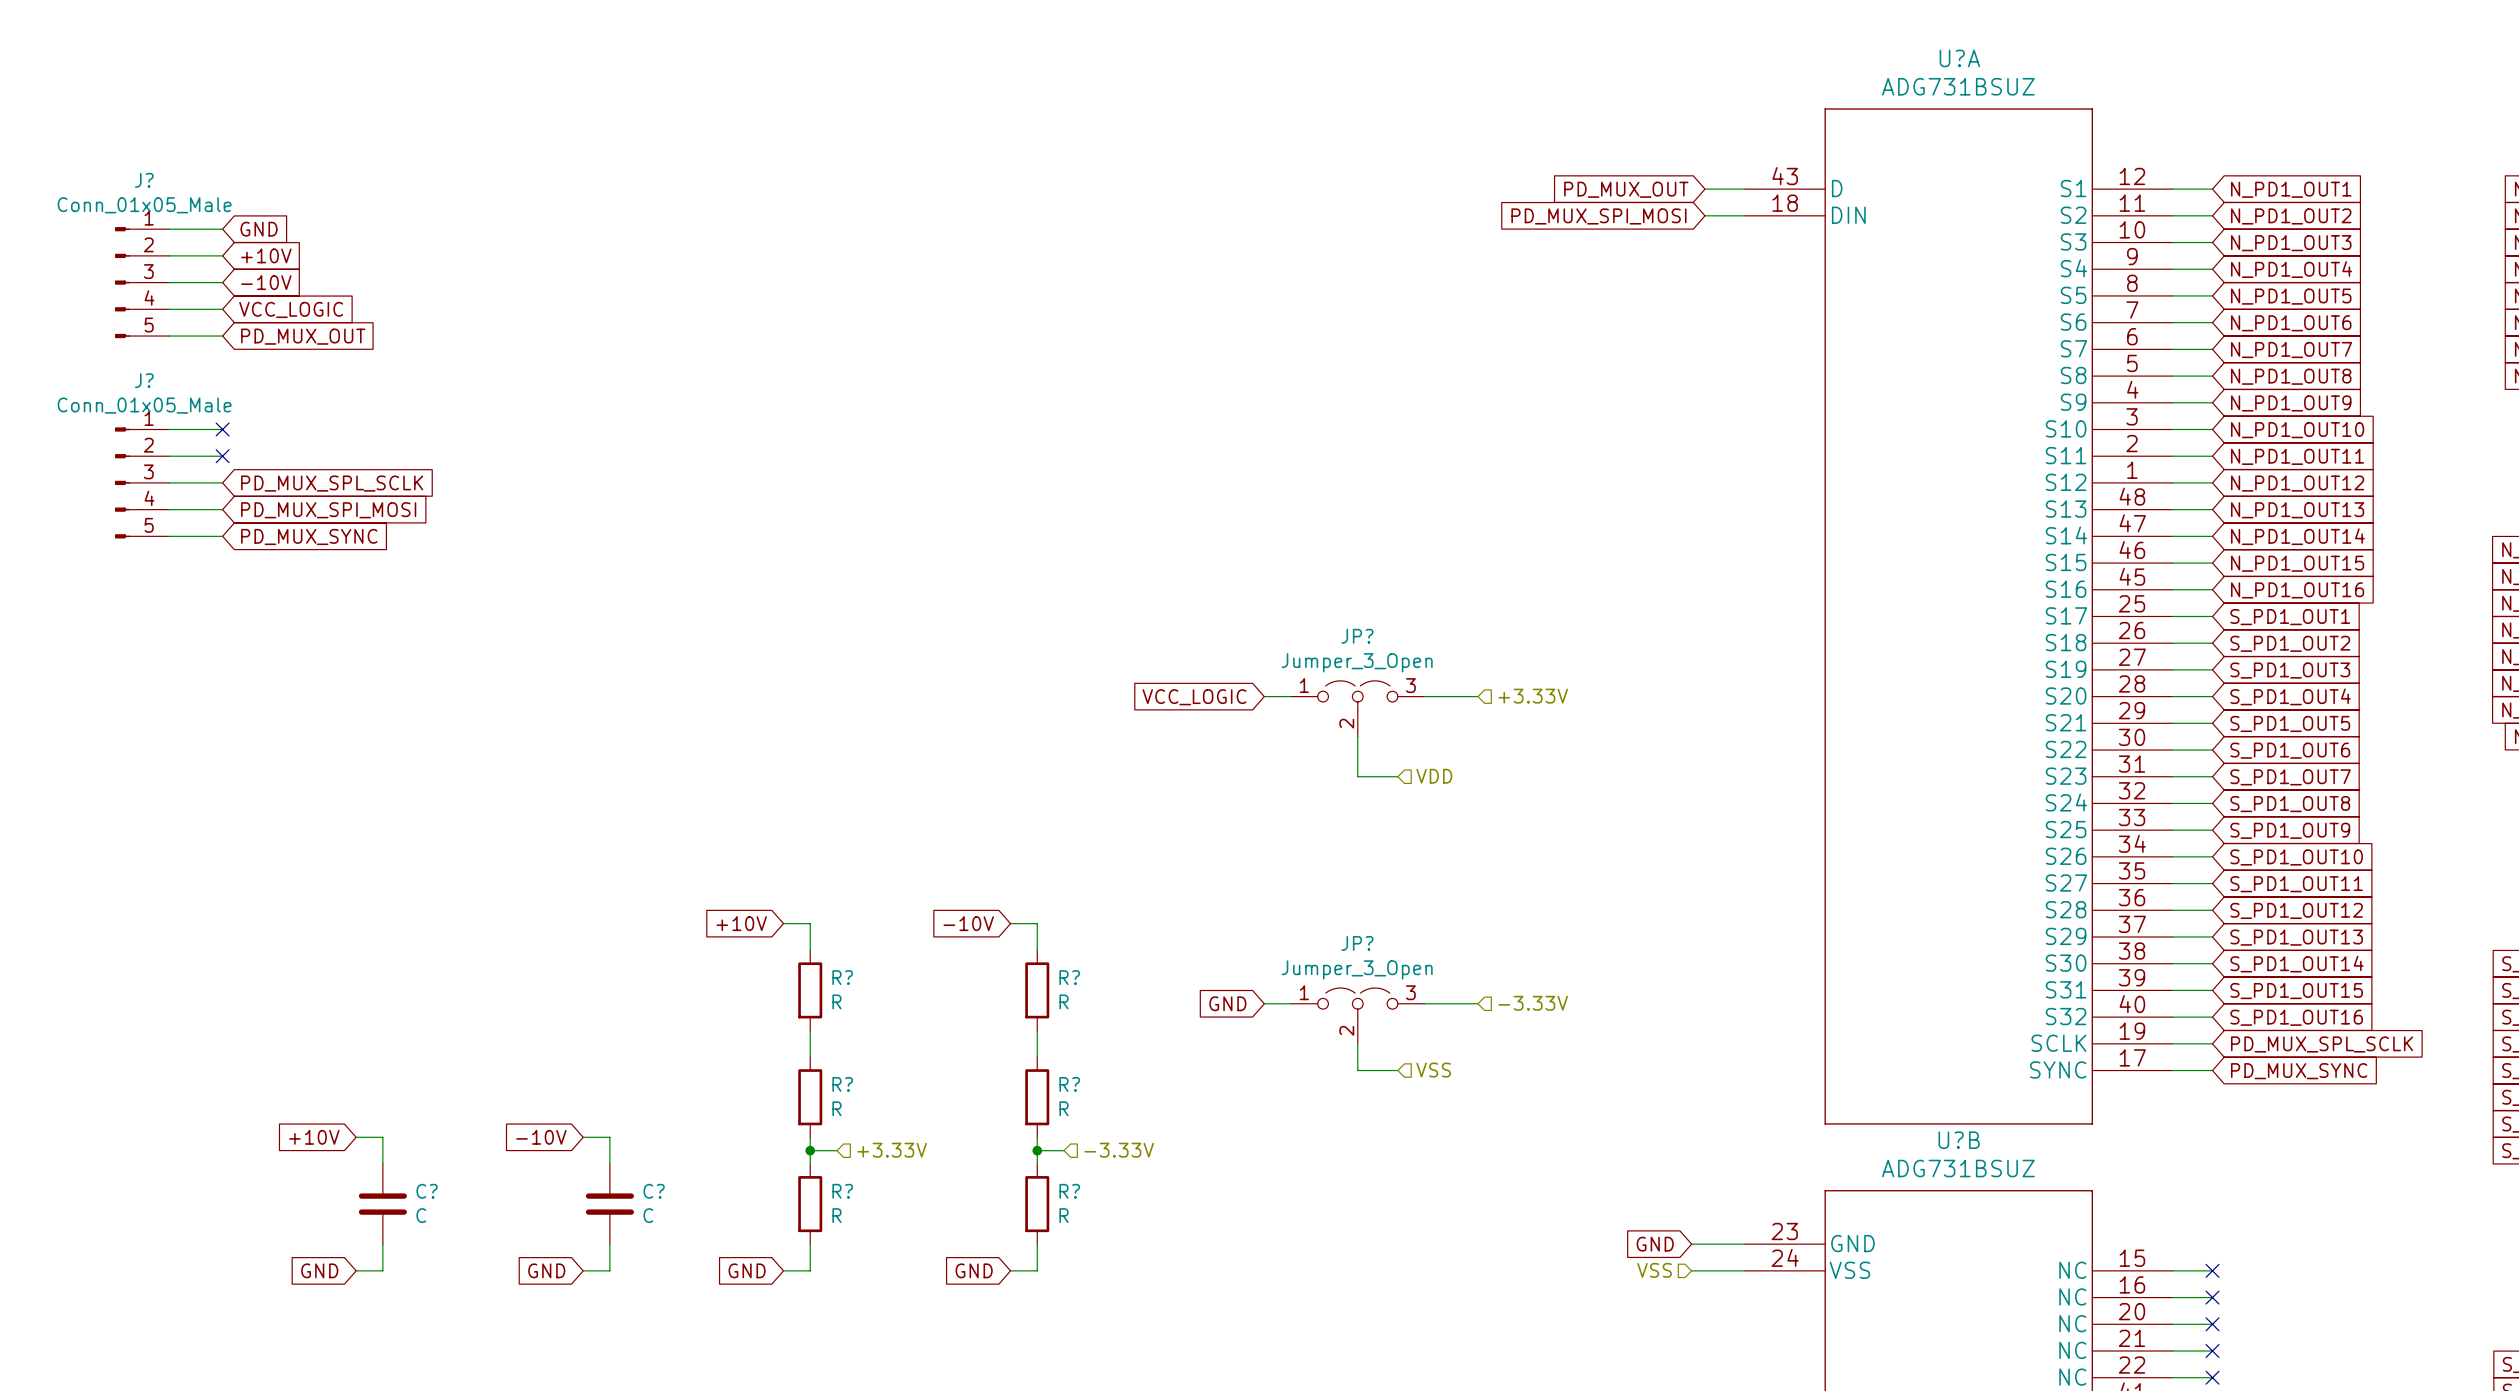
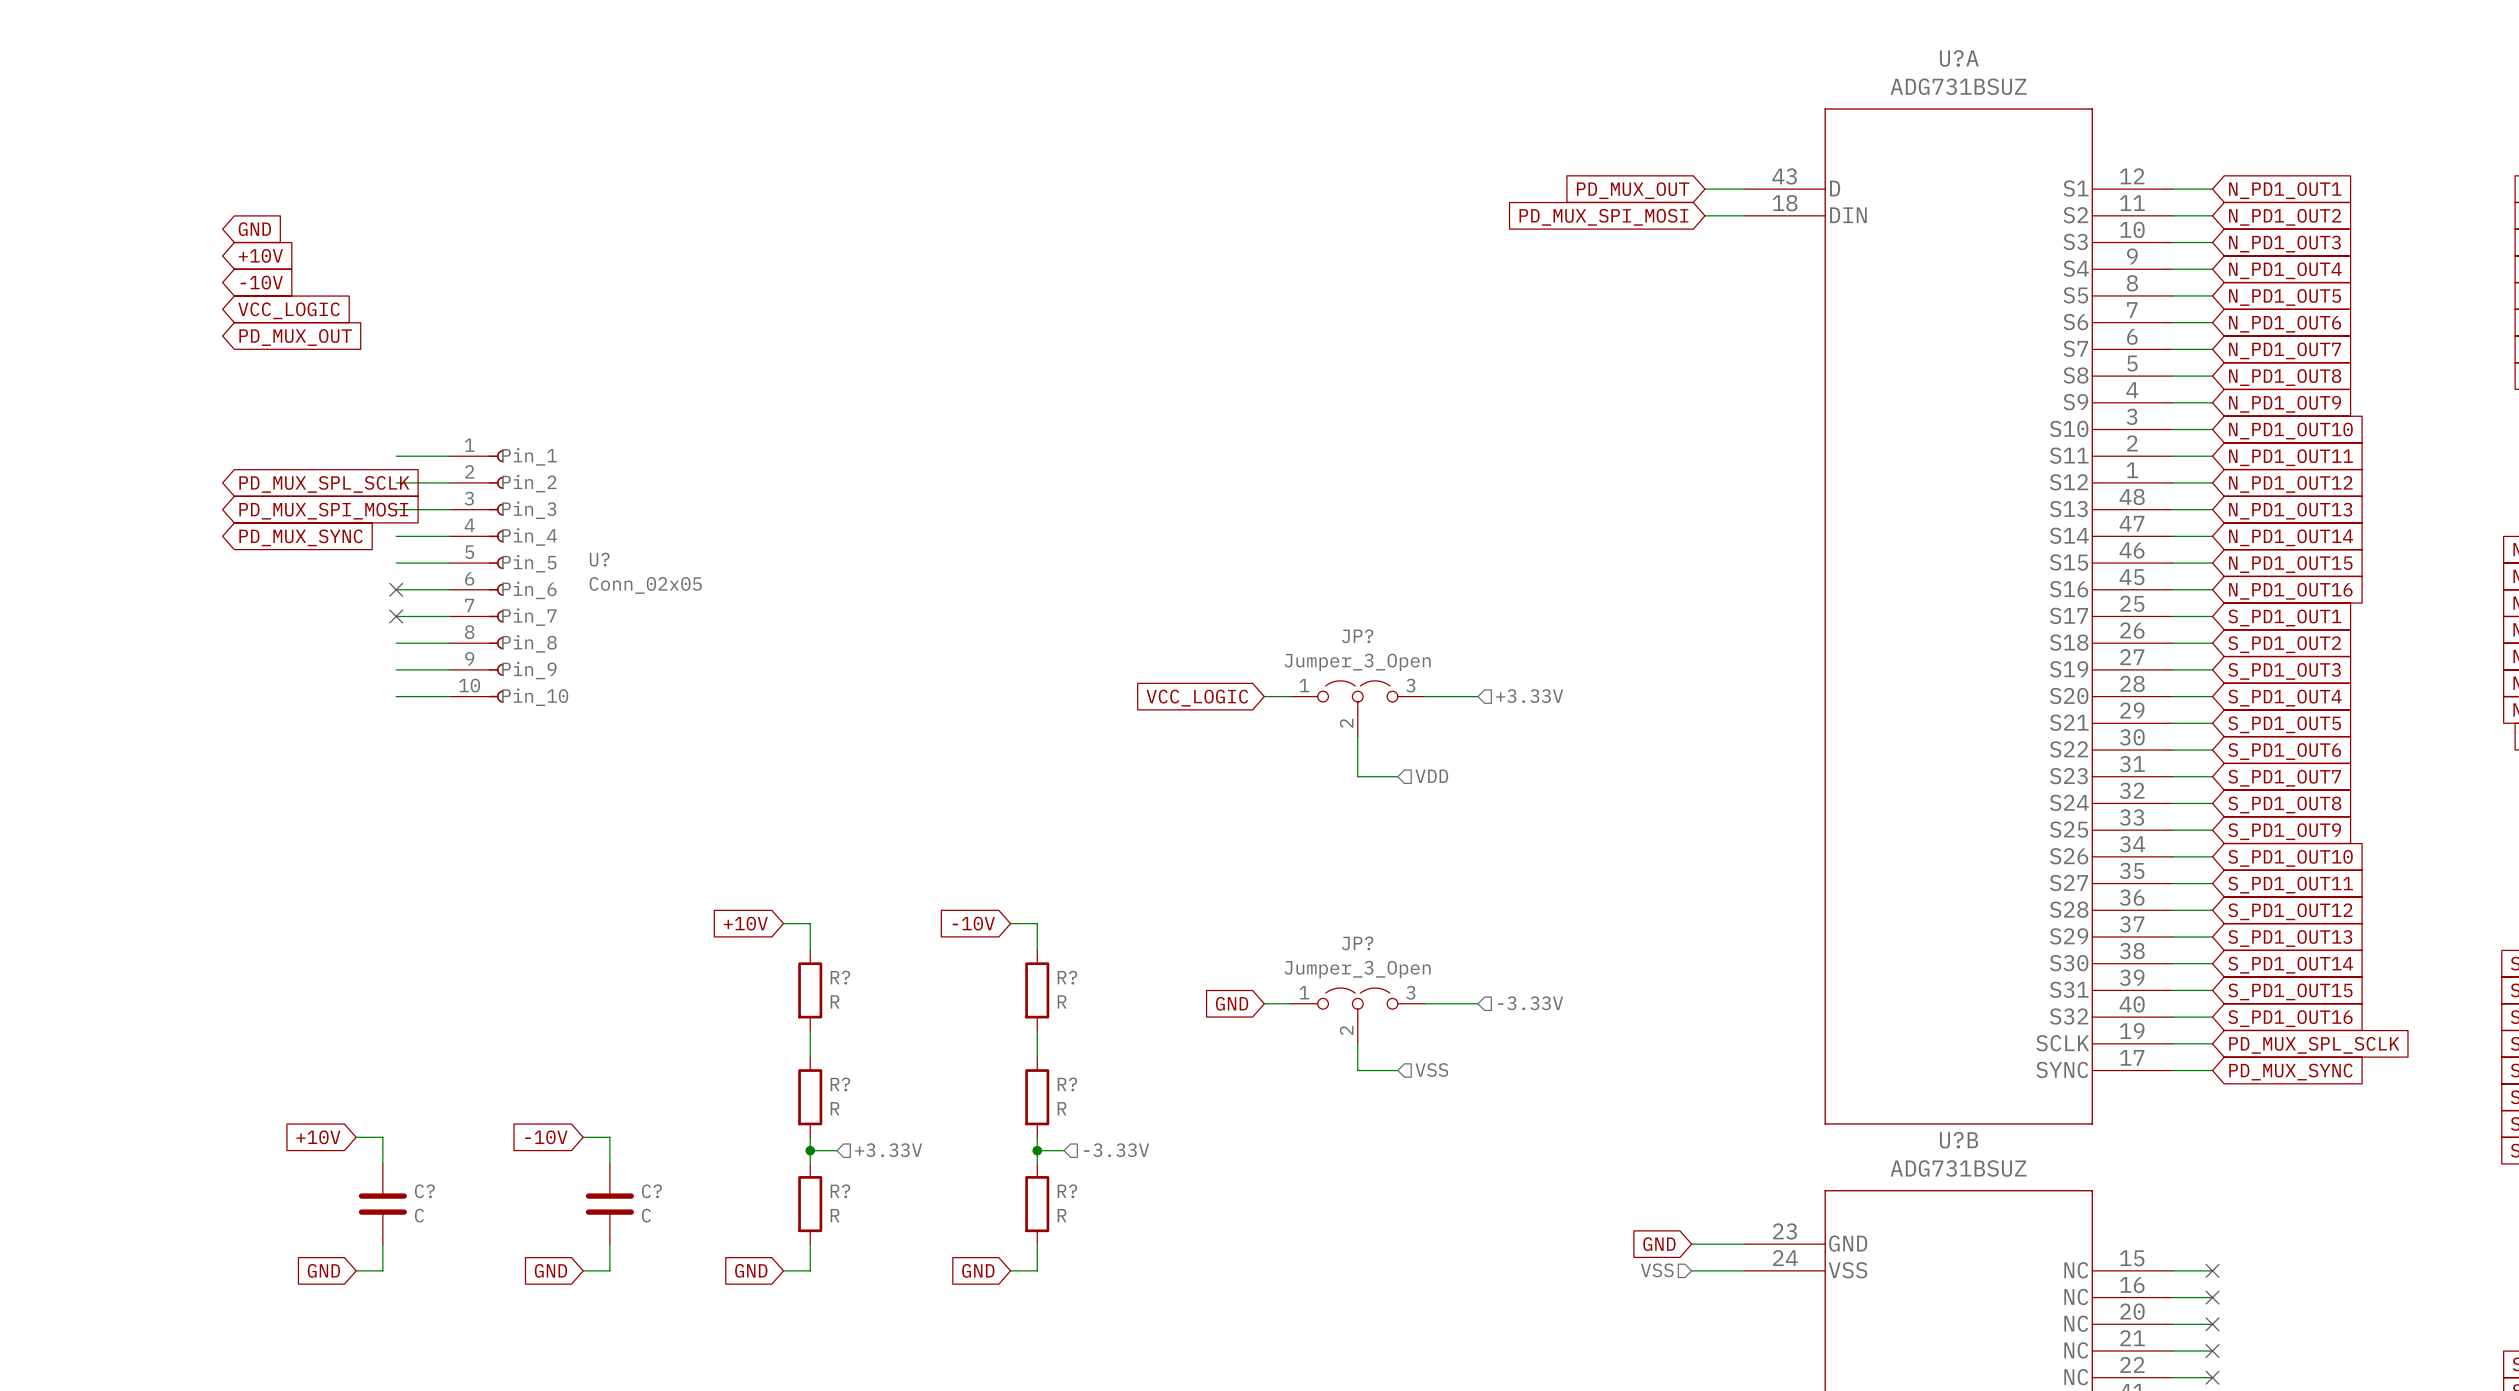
wire: (169, 229) (222, 229) -> none
wire: (169, 255) (222, 255) -> none
J?: Conn_01x05_Male (142, 282) -> none
wire: (169, 282) (222, 282) -> none
wire: (169, 309) (222, 309) -> none
wire: (169, 336) (222, 336) -> none
wire: (169, 429) (222, 429) -> (396, 456) (449, 456)
no-connect mark: (222, 429) -> none
wire: (169, 456) (222, 456) -> (396, 482) (449, 482)
no-connect mark: (222, 456) -> none
J?: Conn_01x05_Male (142, 482) -> none
wire: (169, 482) (222, 482) -> (396, 509) (449, 509)
wire: (169, 509) (222, 509) -> (396, 536) (449, 536)
wire: (169, 536) (222, 536) -> (396, 563) (449, 563)
U?: none -> Conn_02x05 (476, 576)
wire: none -> (396, 589) (449, 589)
no-connect mark: none -> (396, 589)
wire: none -> (396, 616) (449, 616)
no-connect mark: none -> (396, 616)
wire: none -> (396, 643) (449, 643)
wire: none -> (396, 669) (449, 669)
wire: none -> (396, 696) (449, 696)

